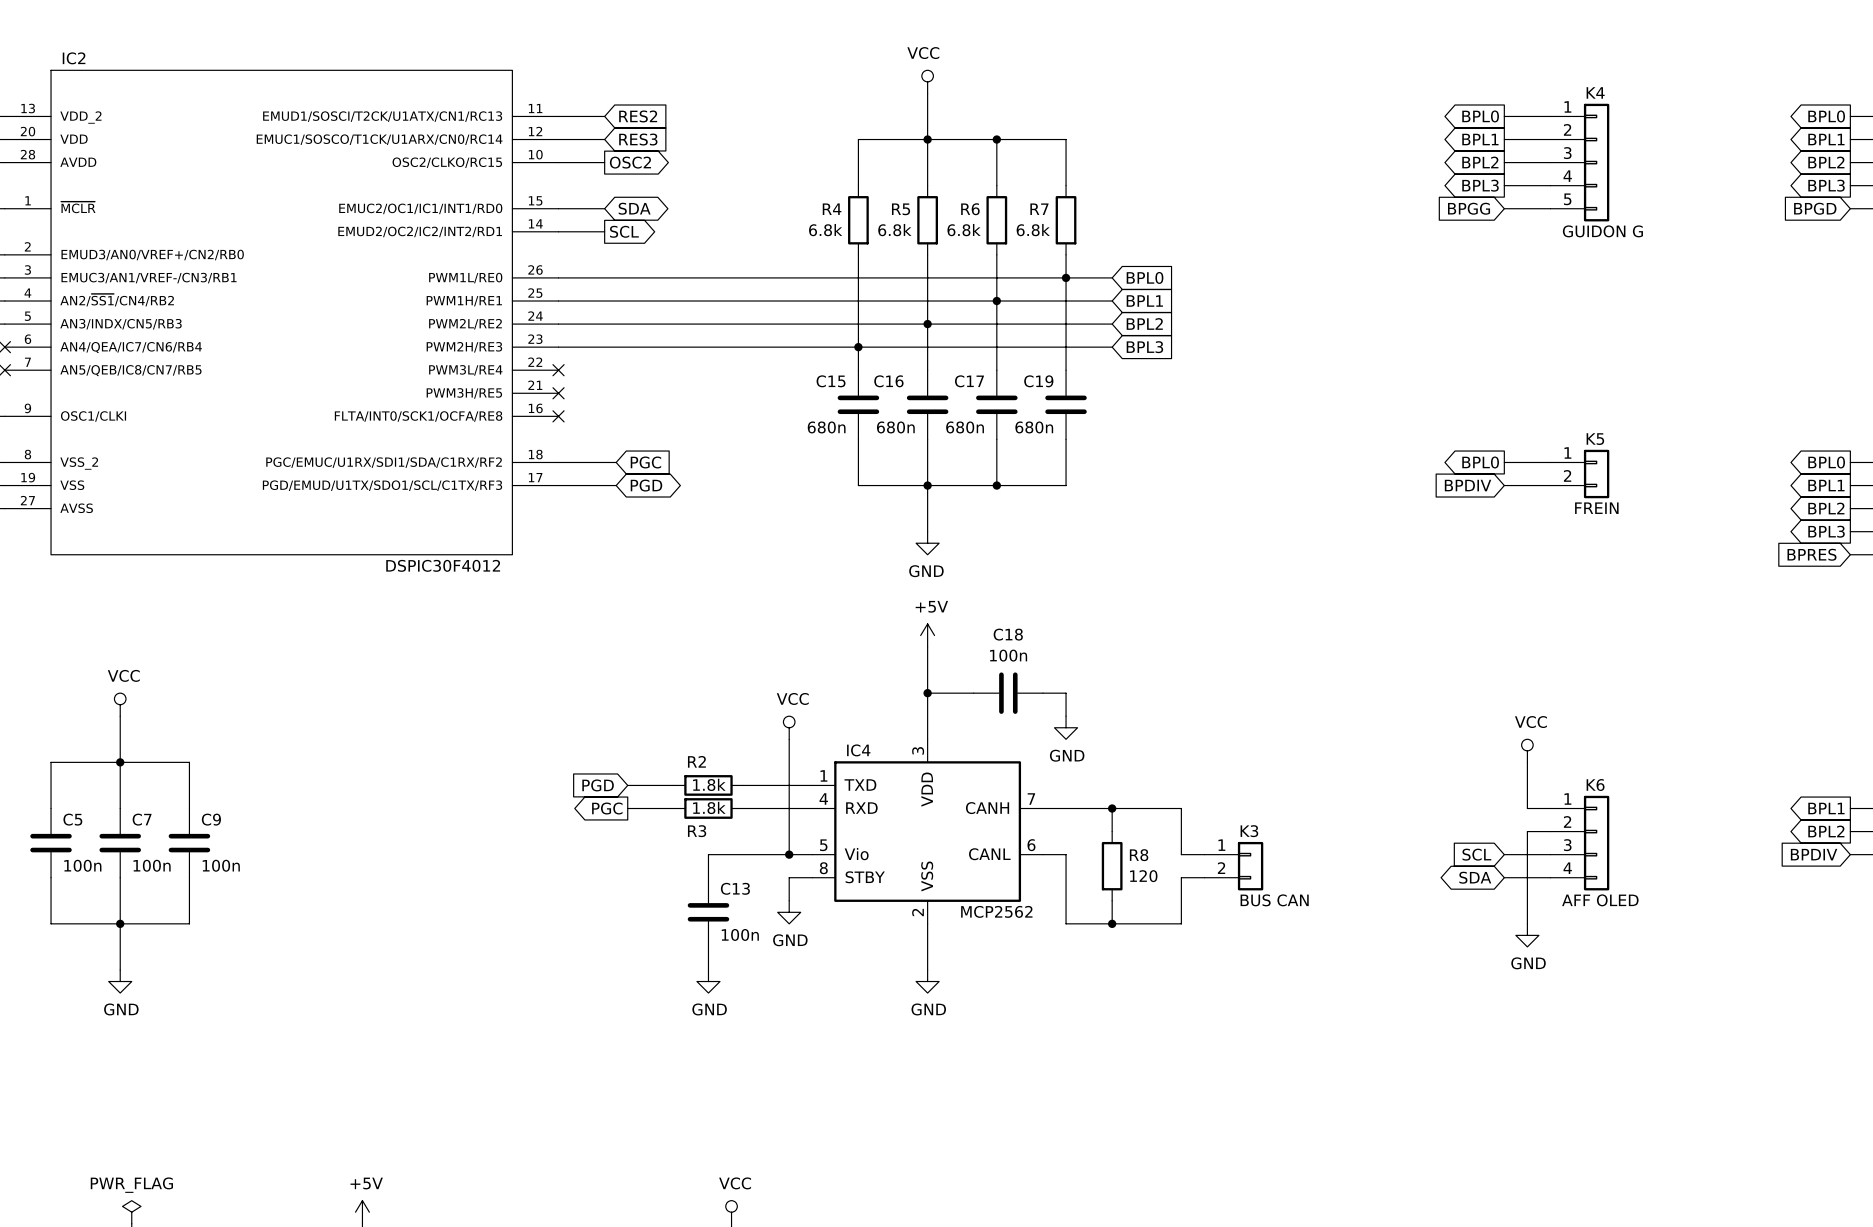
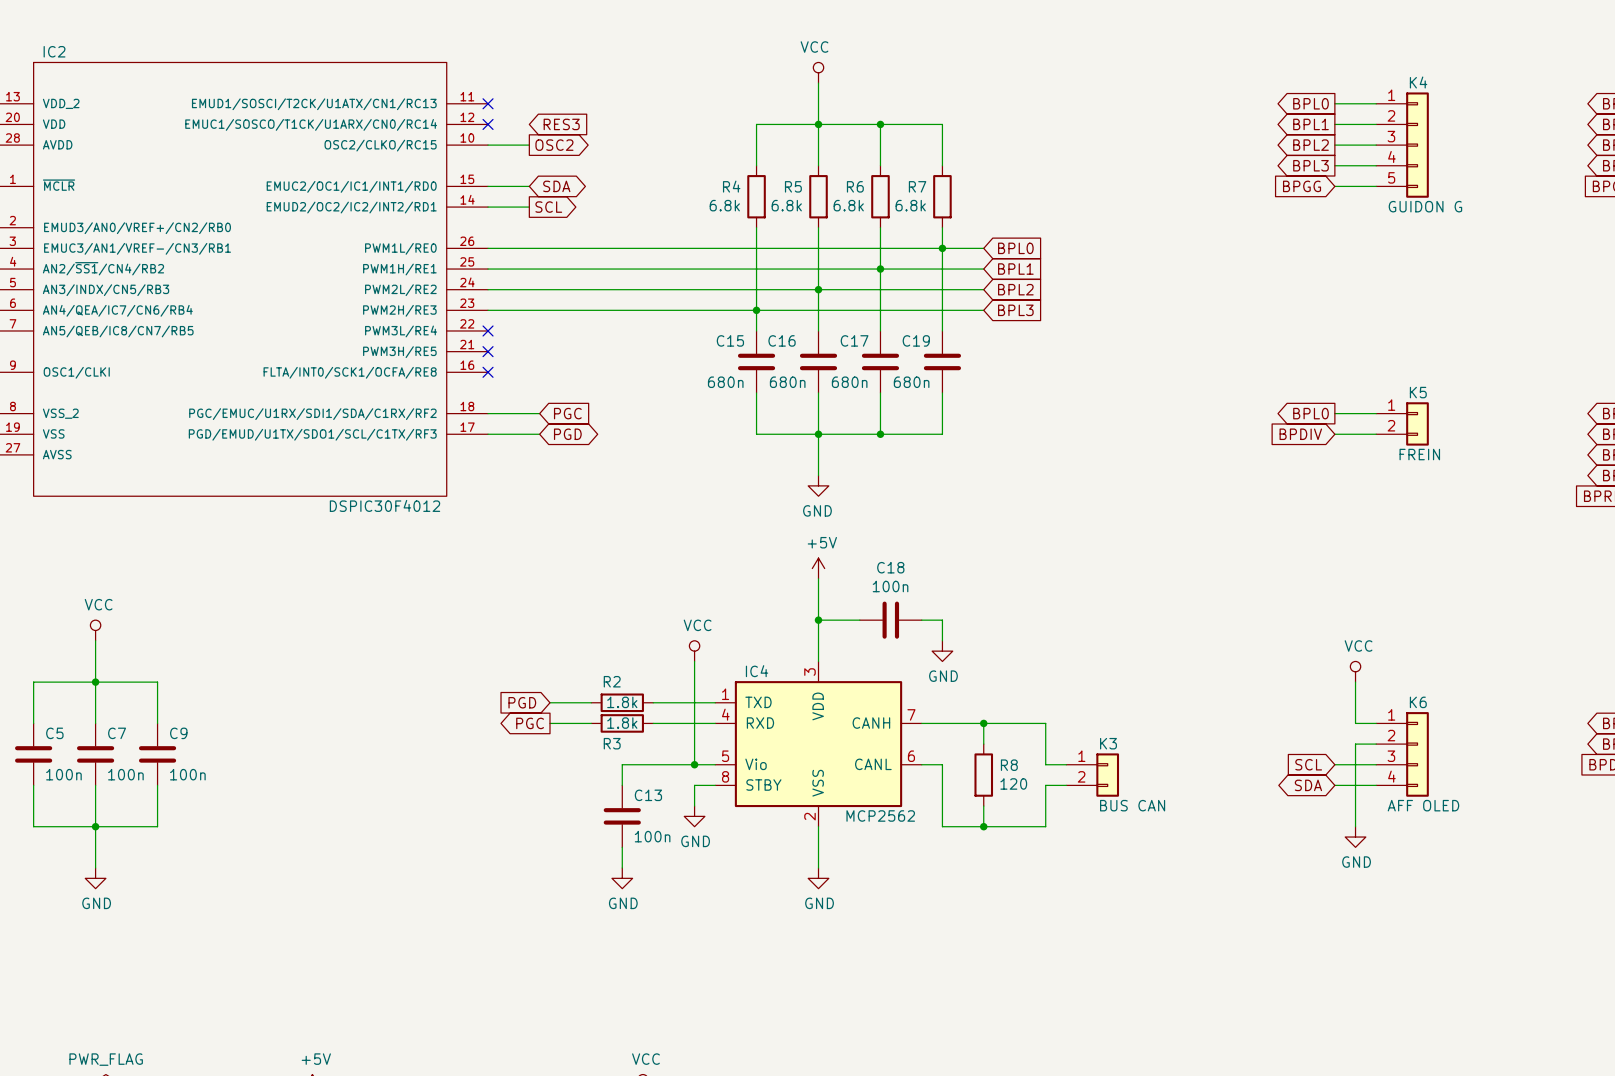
wire: (558, 116) (604, 116) -> none
no-connect mark: none -> (488, 103)
global label: RES2 (638, 116) -> none
wire: (558, 139) (604, 139) -> none
no-connect mark: none -> (488, 124)

